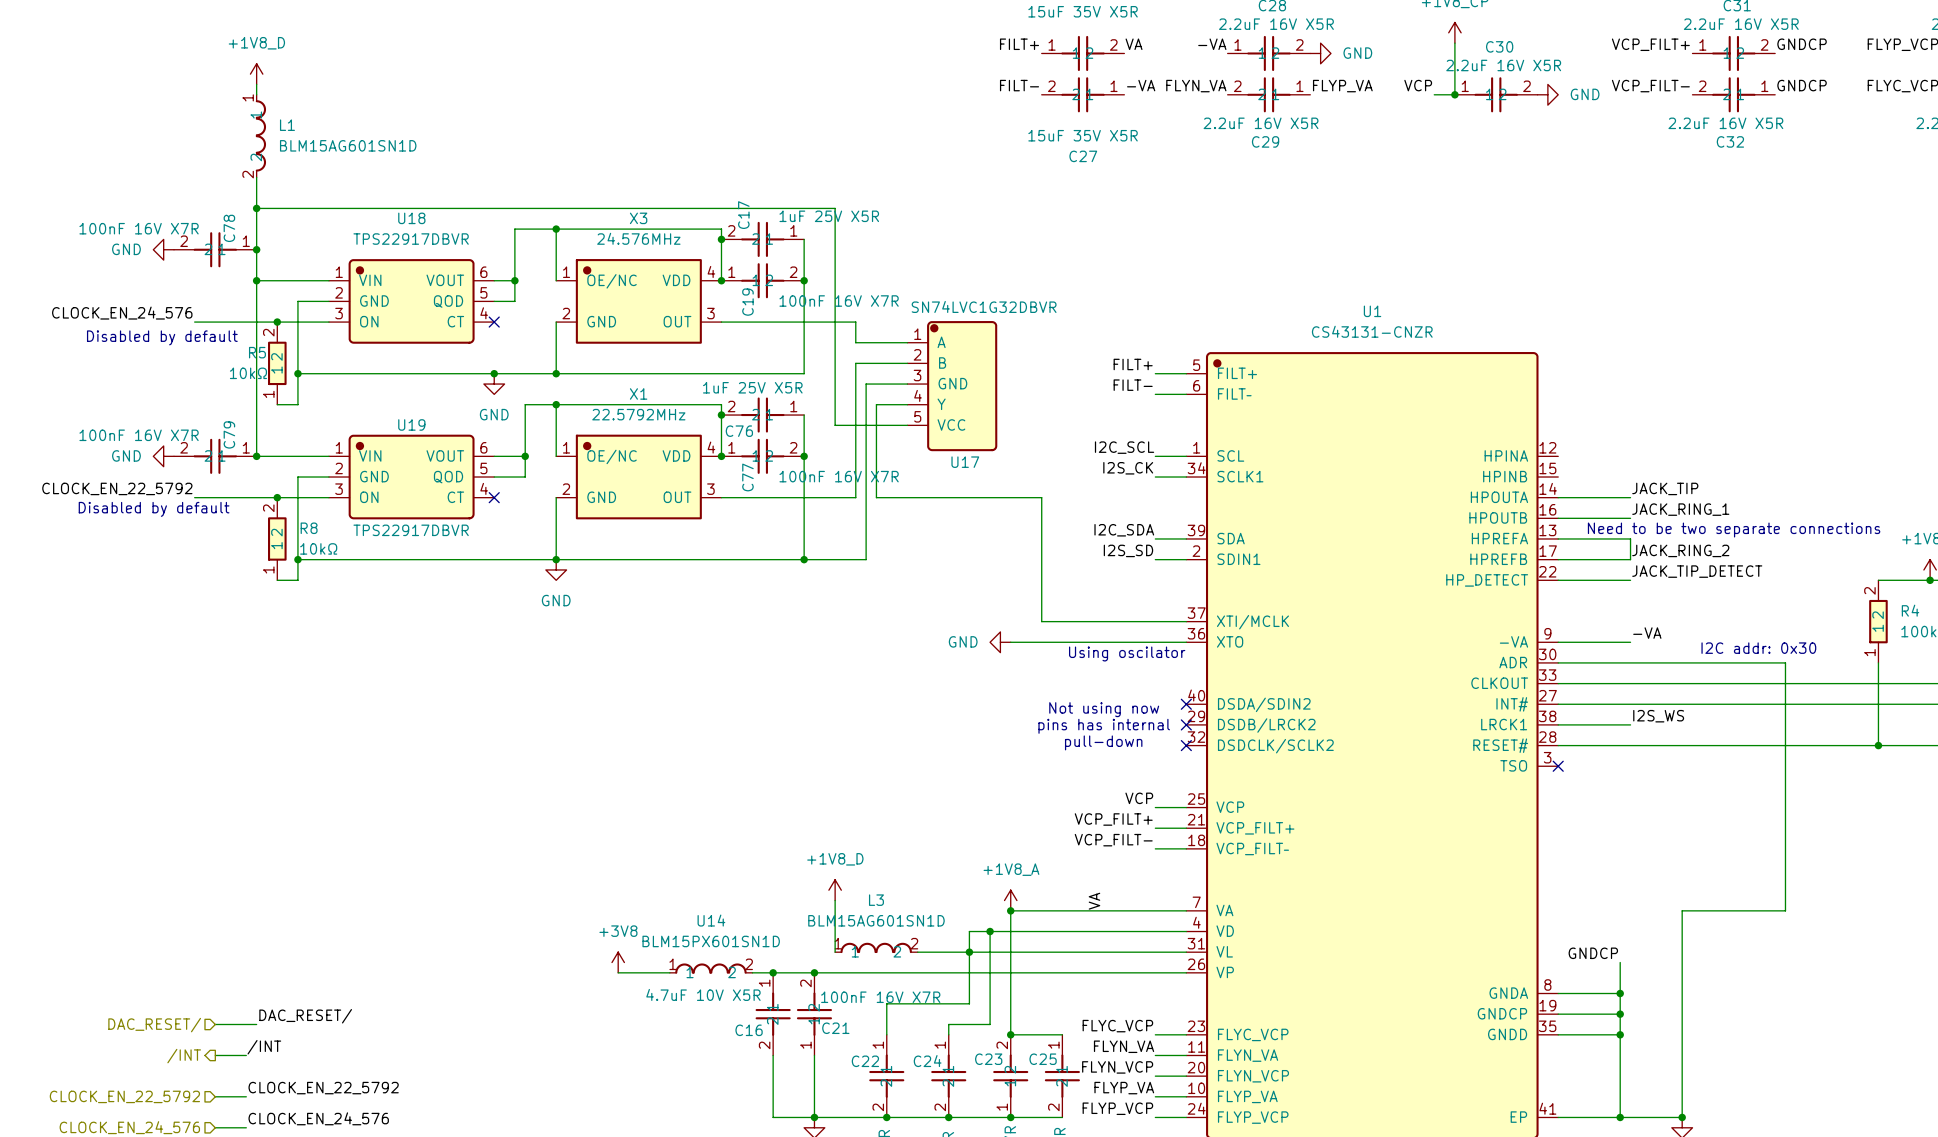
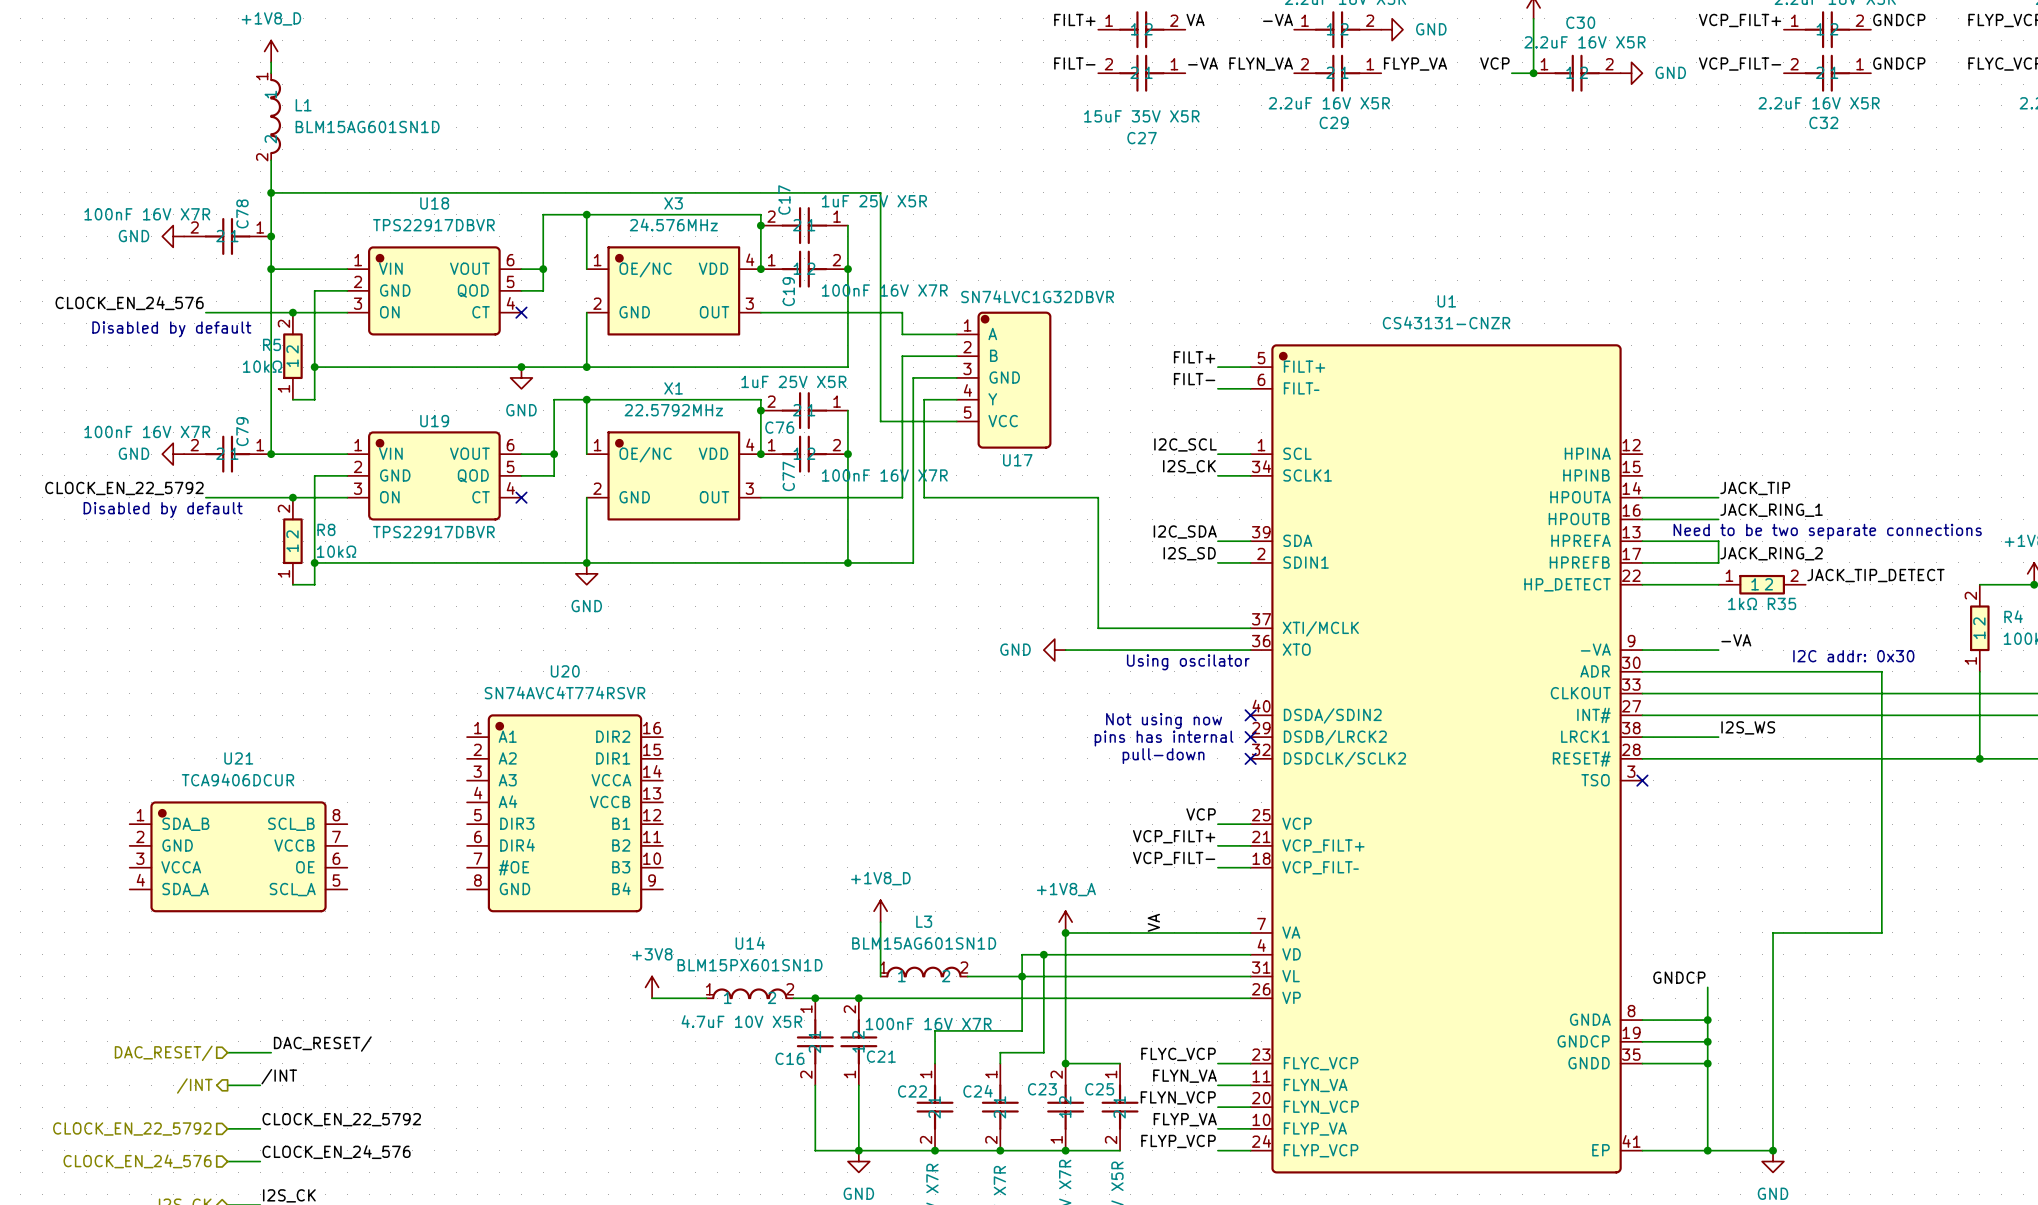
label position: JACK_TIP_DETECT (1697, 571) -> JACK_TIP_DETECT (1875, 575)
R35: none -> 1kΩ (1762, 584)
U20: none -> SN74AVC4T774RSVR (565, 813)
U21: none -> TCA9406DCUR (238, 856)

